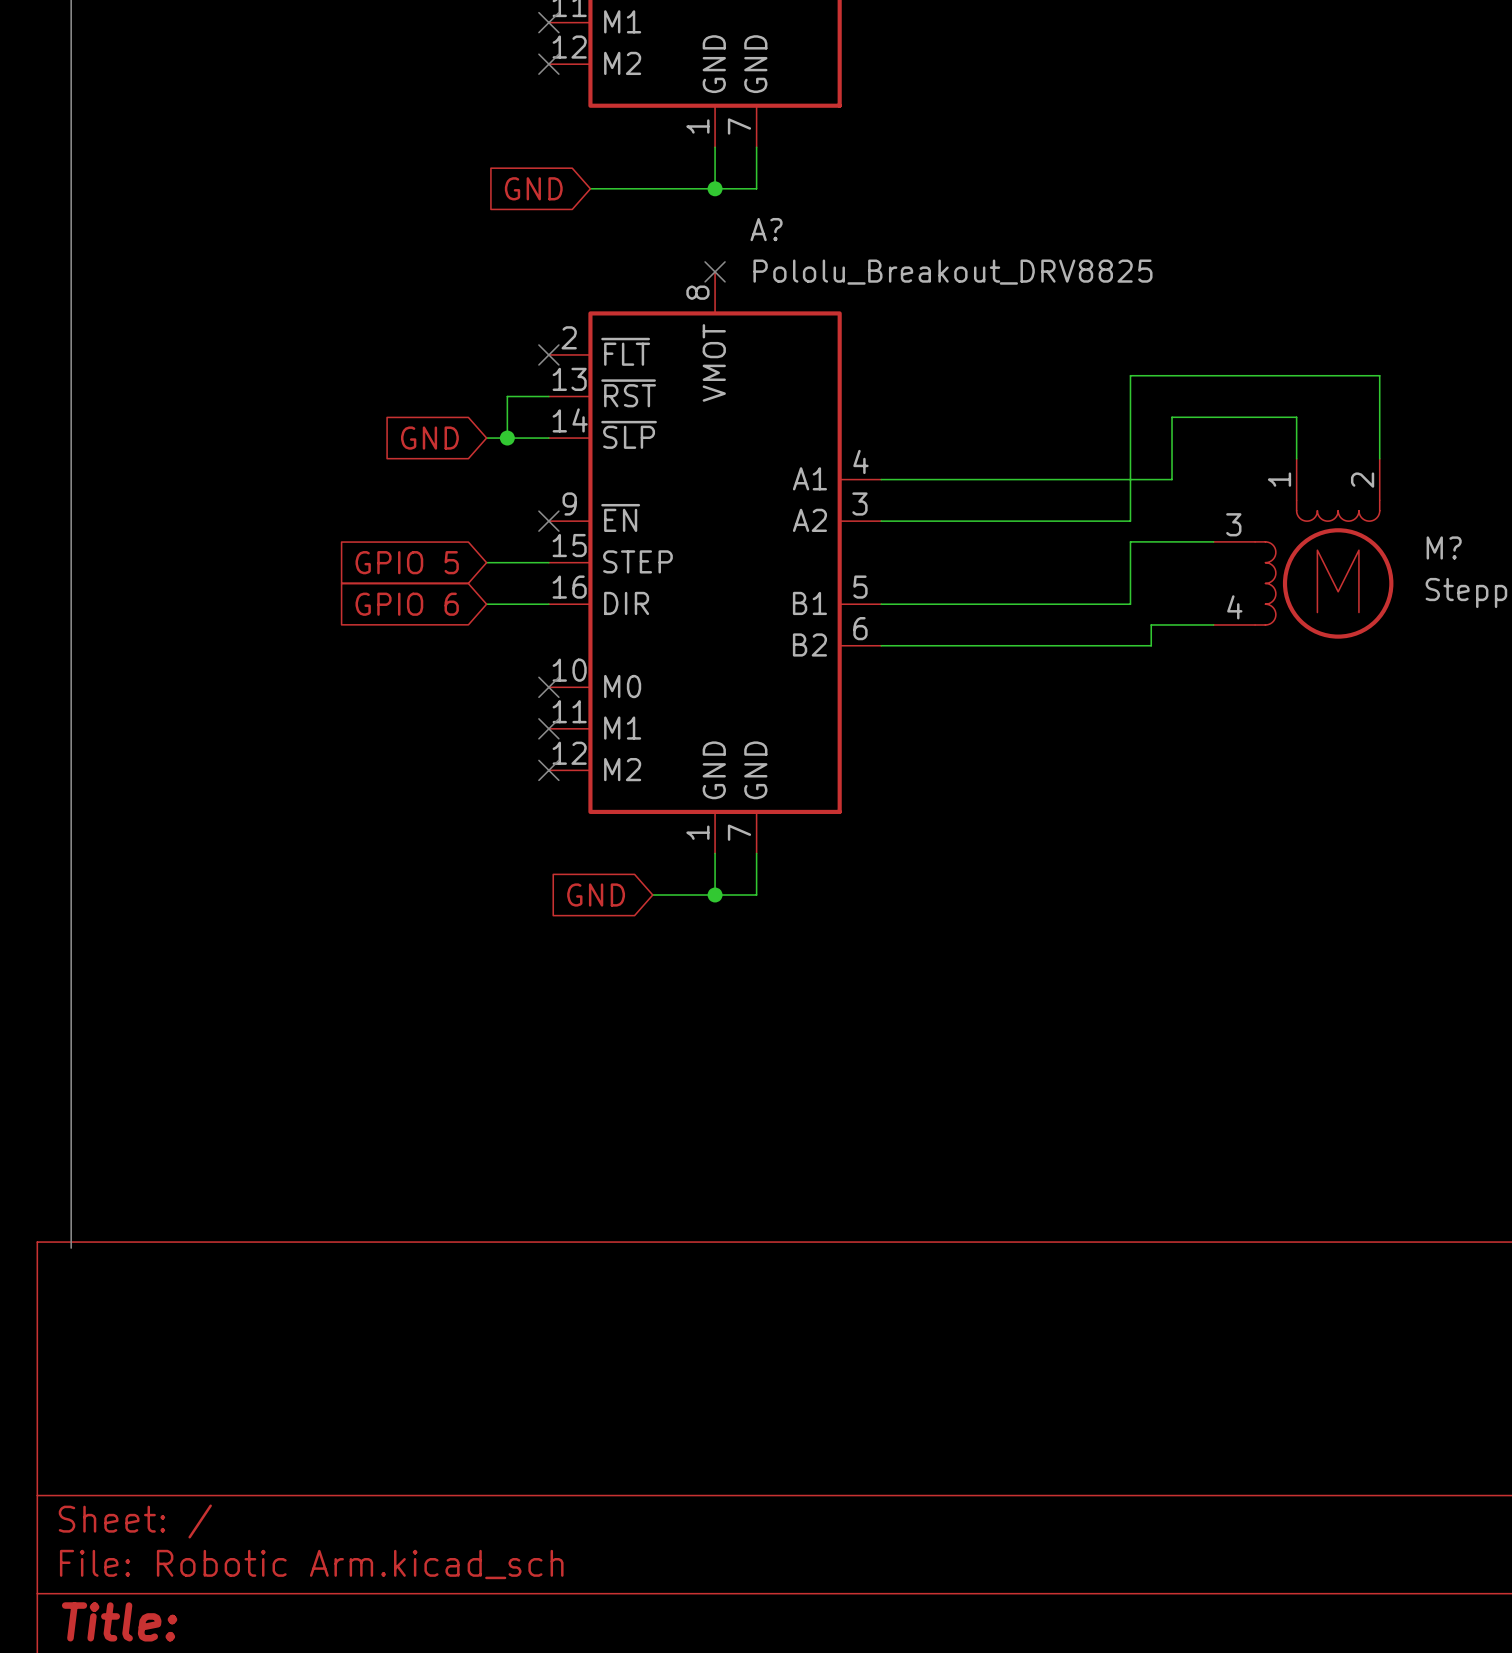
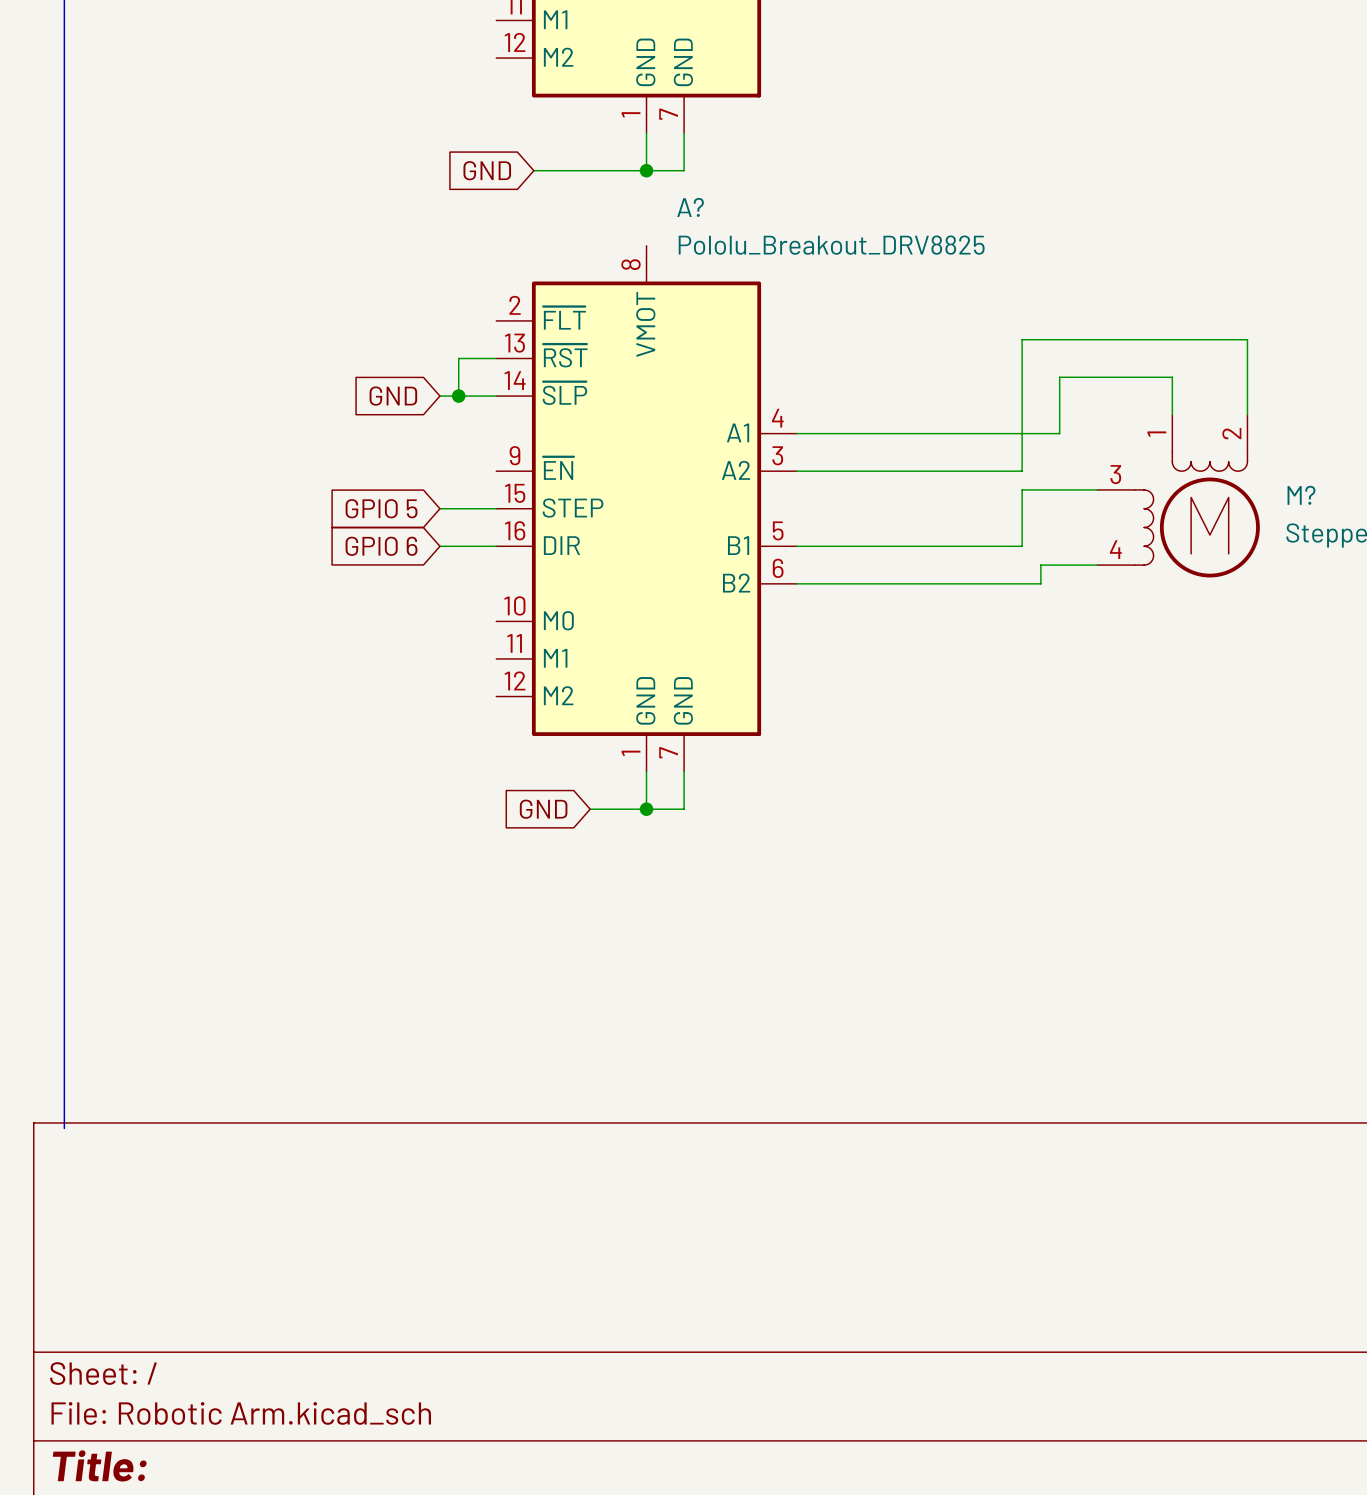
no-connect mark: (548, 22) -> none
no-connect mark: (548, 64) -> none
no-connect mark: (715, 271) -> none
no-connect mark: (548, 354) -> none
no-connect mark: (548, 521) -> none
no-connect mark: (548, 687) -> none
no-connect mark: (548, 728) -> none
no-connect mark: (548, 770) -> none

